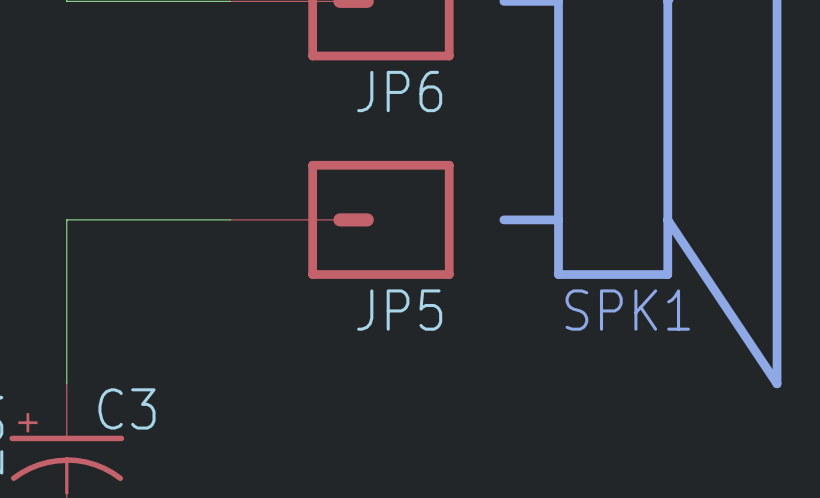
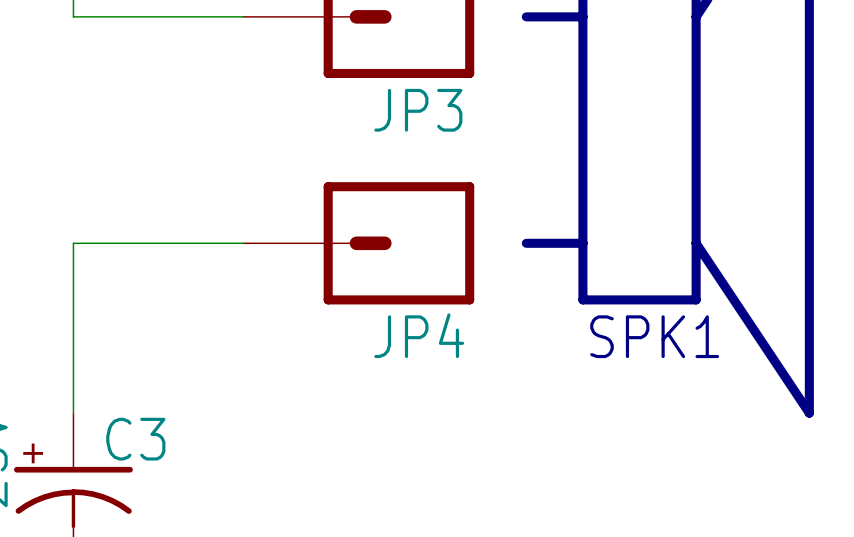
JP6 name: JP6 (399, 91) -> JP3 (418, 110)
JP5 name: JP5 (399, 310) -> JP4 (419, 335)

